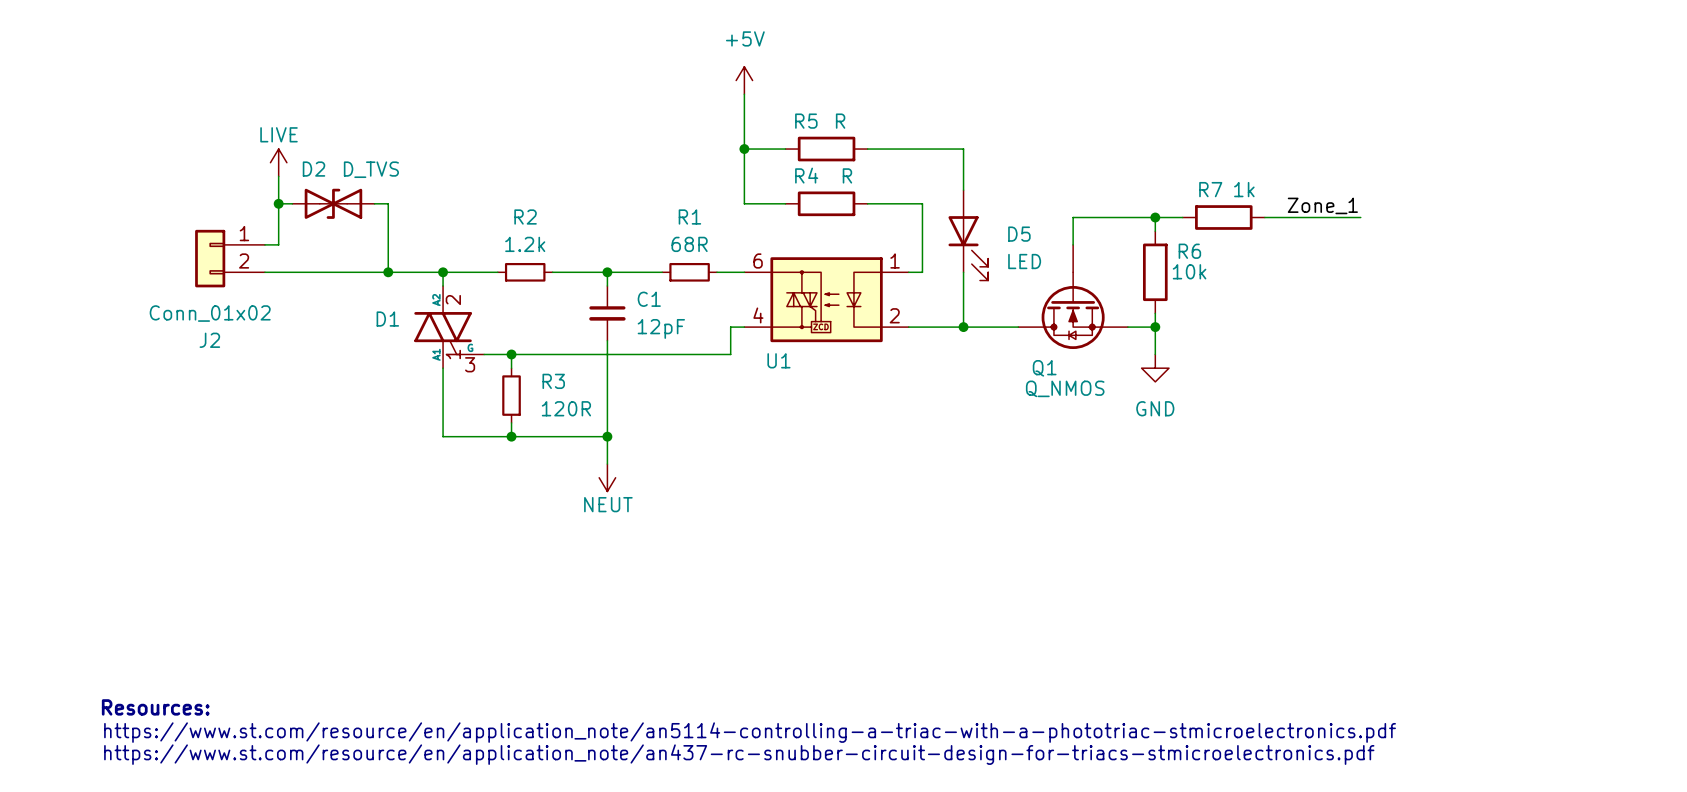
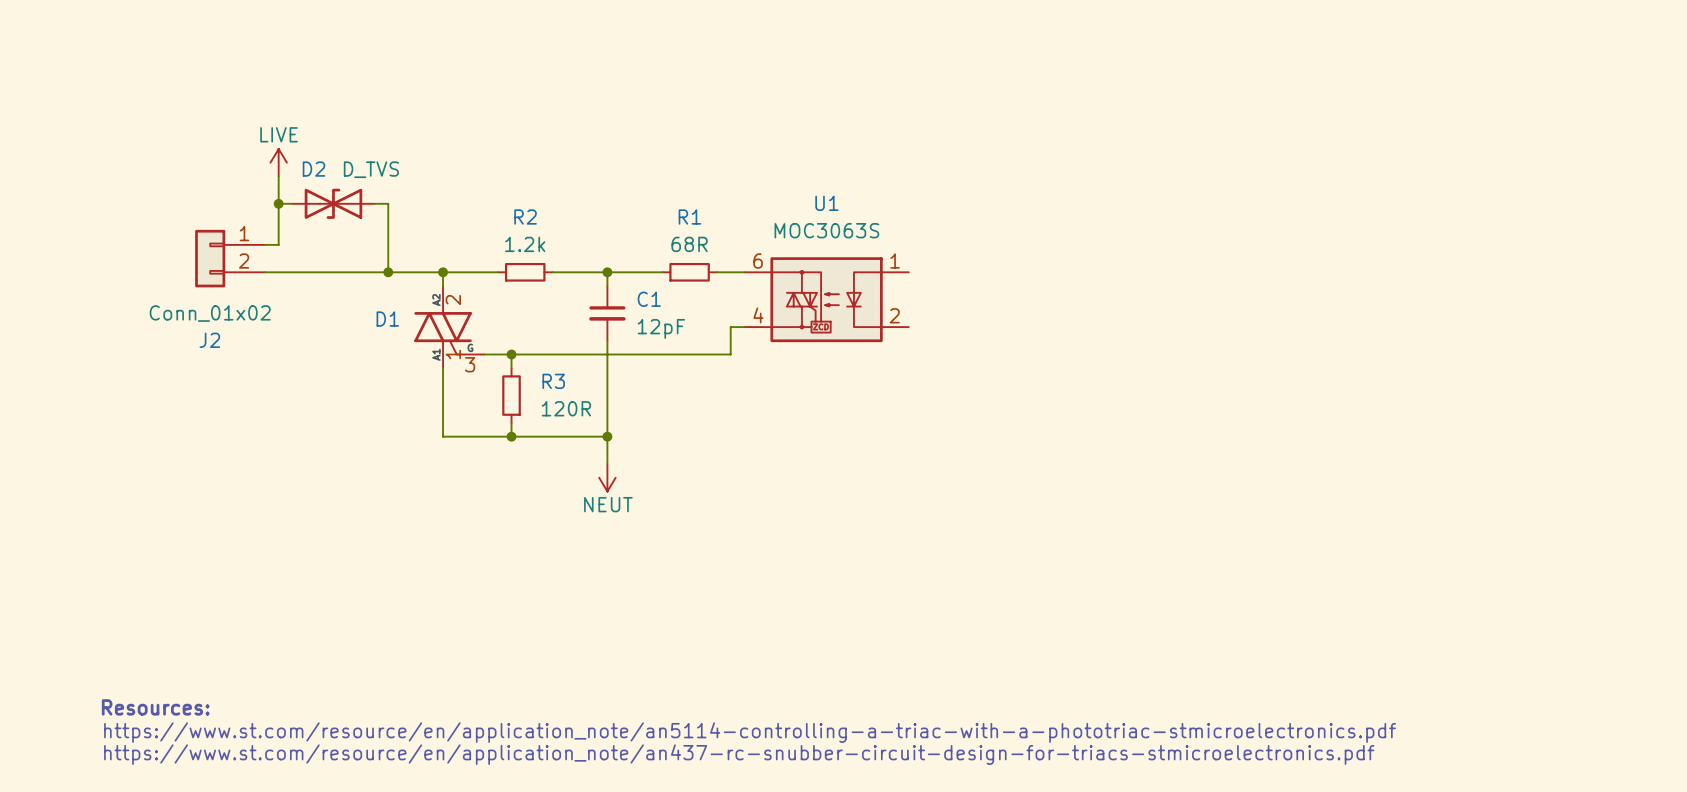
power symbol: +5V (744, 80) -> none
wire: (744, 94) (744, 203) (785, 203) -> none
wire: (744, 149) (785, 149) -> none
junction: (744, 149) -> none
R5: R (826, 149) -> none
wire: (867, 149) (963, 149) (963, 190) -> none
R4: R (826, 203) -> none
wire: (867, 203) (922, 203) (922, 272) (908, 272) -> none
label: Zone_1 (1322, 205) -> none
wire: (1155, 217) (1155, 231) -> none
junction: (1155, 217) -> none
wire: (1182, 217) (1073, 217) (1073, 244) -> none
R7: 1k (1223, 217) -> none
wire: (1264, 217) (1360, 217) -> none
U1 value: none -> MOC3063S (826, 230)
D5: LED (968, 235) -> none
wire: (963, 272) (963, 327) -> none
R6: 10k (1155, 272) -> none
Q1: Q_NMOS (1073, 296) -> none
wire: (1155, 313) (1155, 354) -> none
wire: (908, 327) (1018, 327) -> none
junction: (963, 327) -> none
wire: (1127, 327) (1155, 327) -> none
junction: (1155, 327) -> none
U1 name position: U1 (778, 360) -> U1 (826, 203)
power symbol: GND (1155, 368) -> none

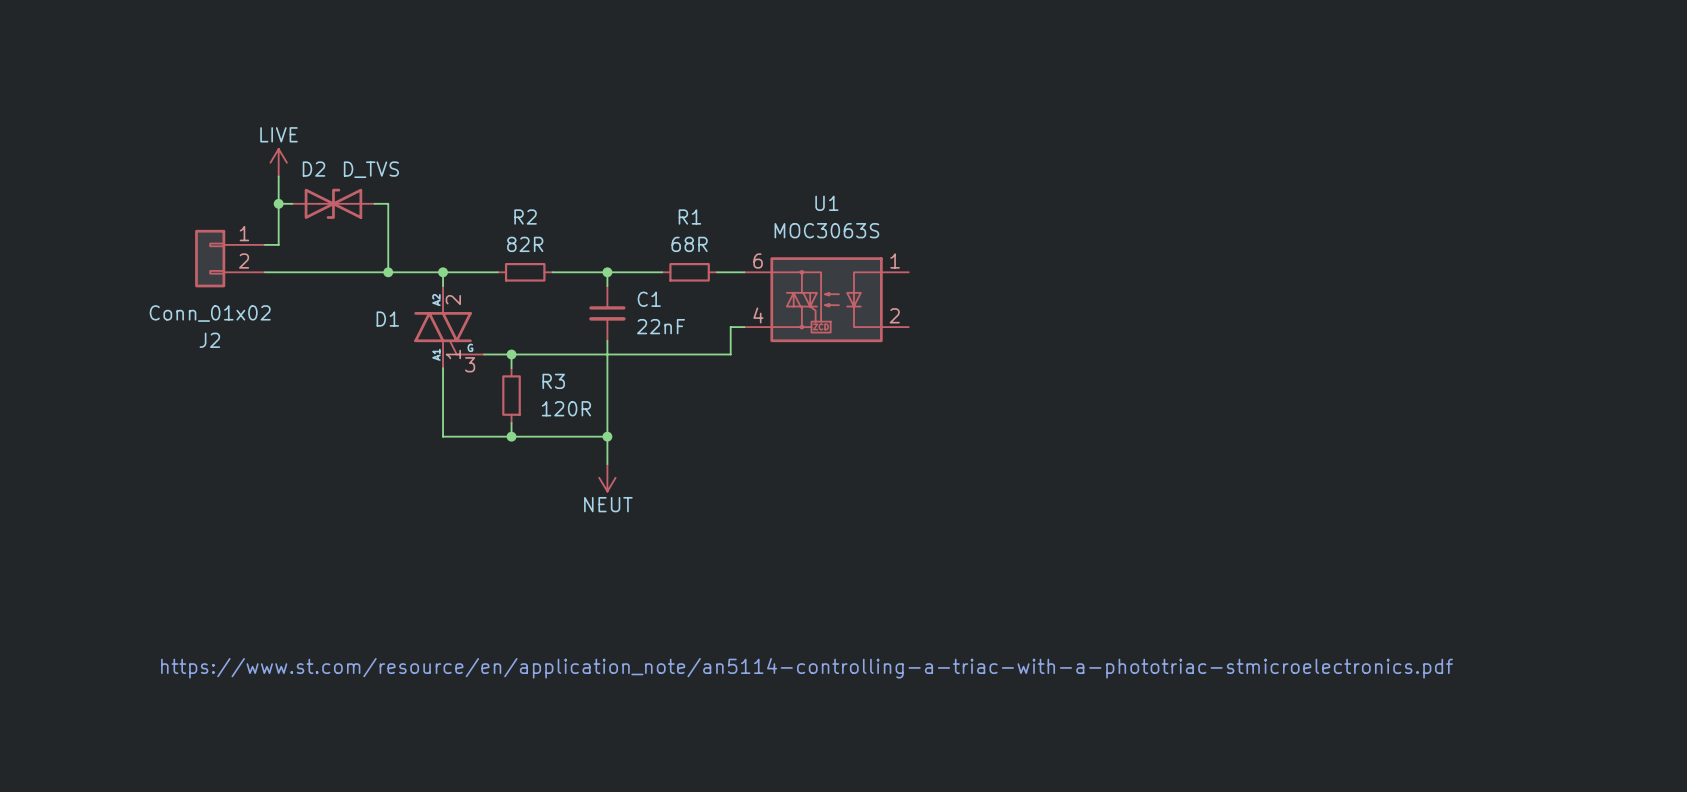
R2 value: 1.2k (525, 244) -> 82R (525, 244)
C1 value: 12pF (661, 328) -> 22nF (661, 326)
text: none -> https://www.st.com/resource/en/application_note/an5114-controlling-a-triac-with-a-phototriac-stmicroelectronics.pdf (807, 668)
text: Resources: (155, 707) -> none
text: https://www.st.com/resource/en/application_note/an5114-controlling-a-triac-with-a-phototriac-stmicroelectronics.pdf (750, 732) -> none
text: https://www.st.com/resource/en/application_note/an437-rc-snubber-circuit-design-for-triacs-stmicroelectronics.pdf (739, 754) -> none

